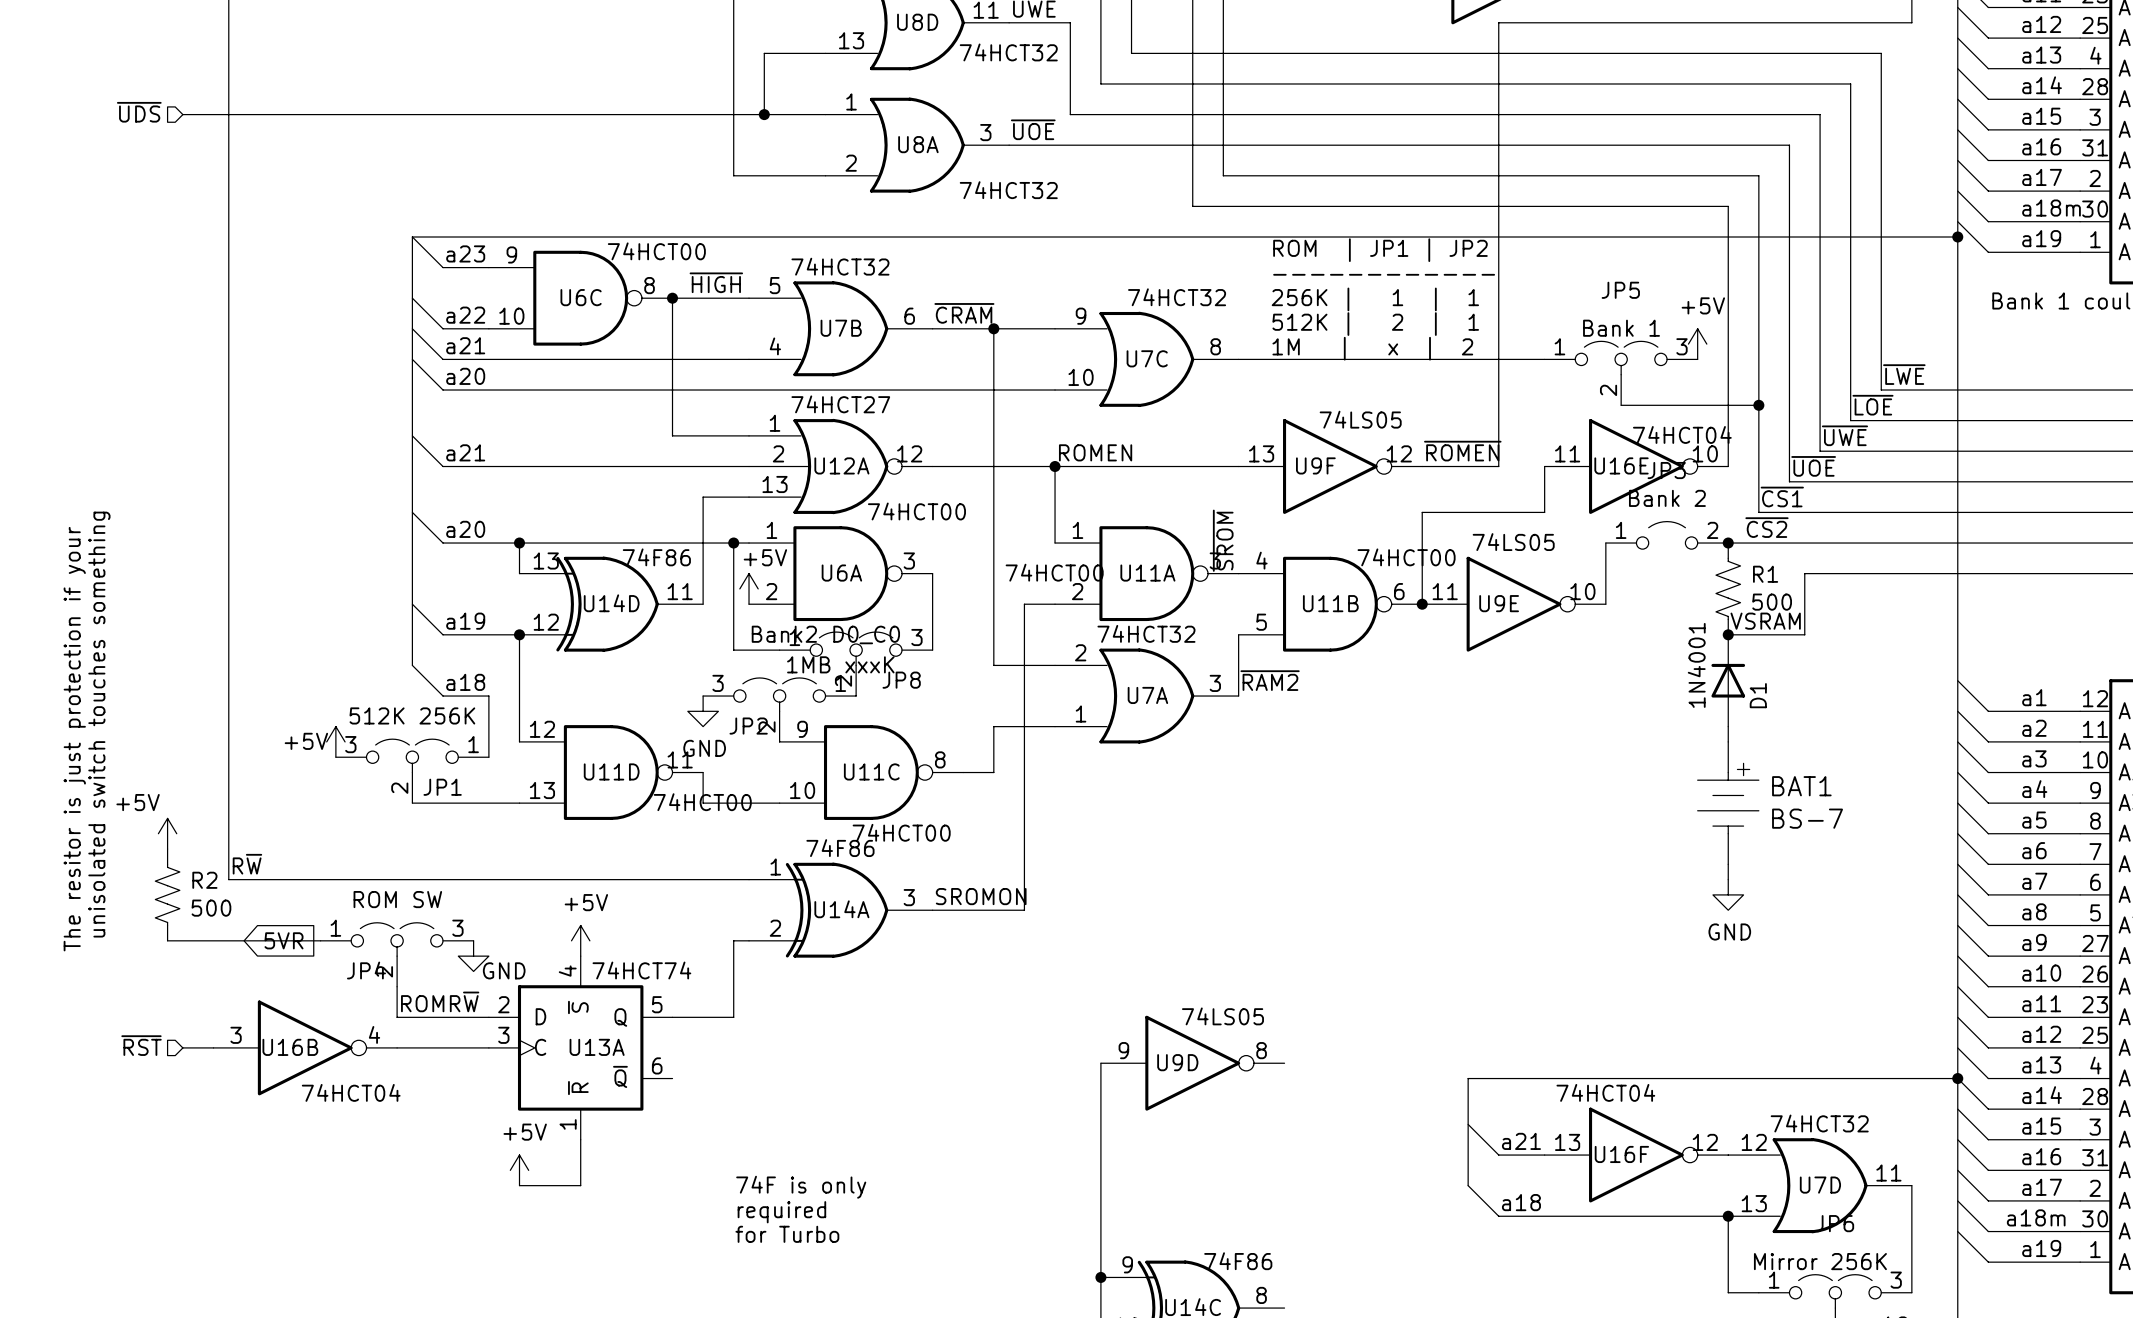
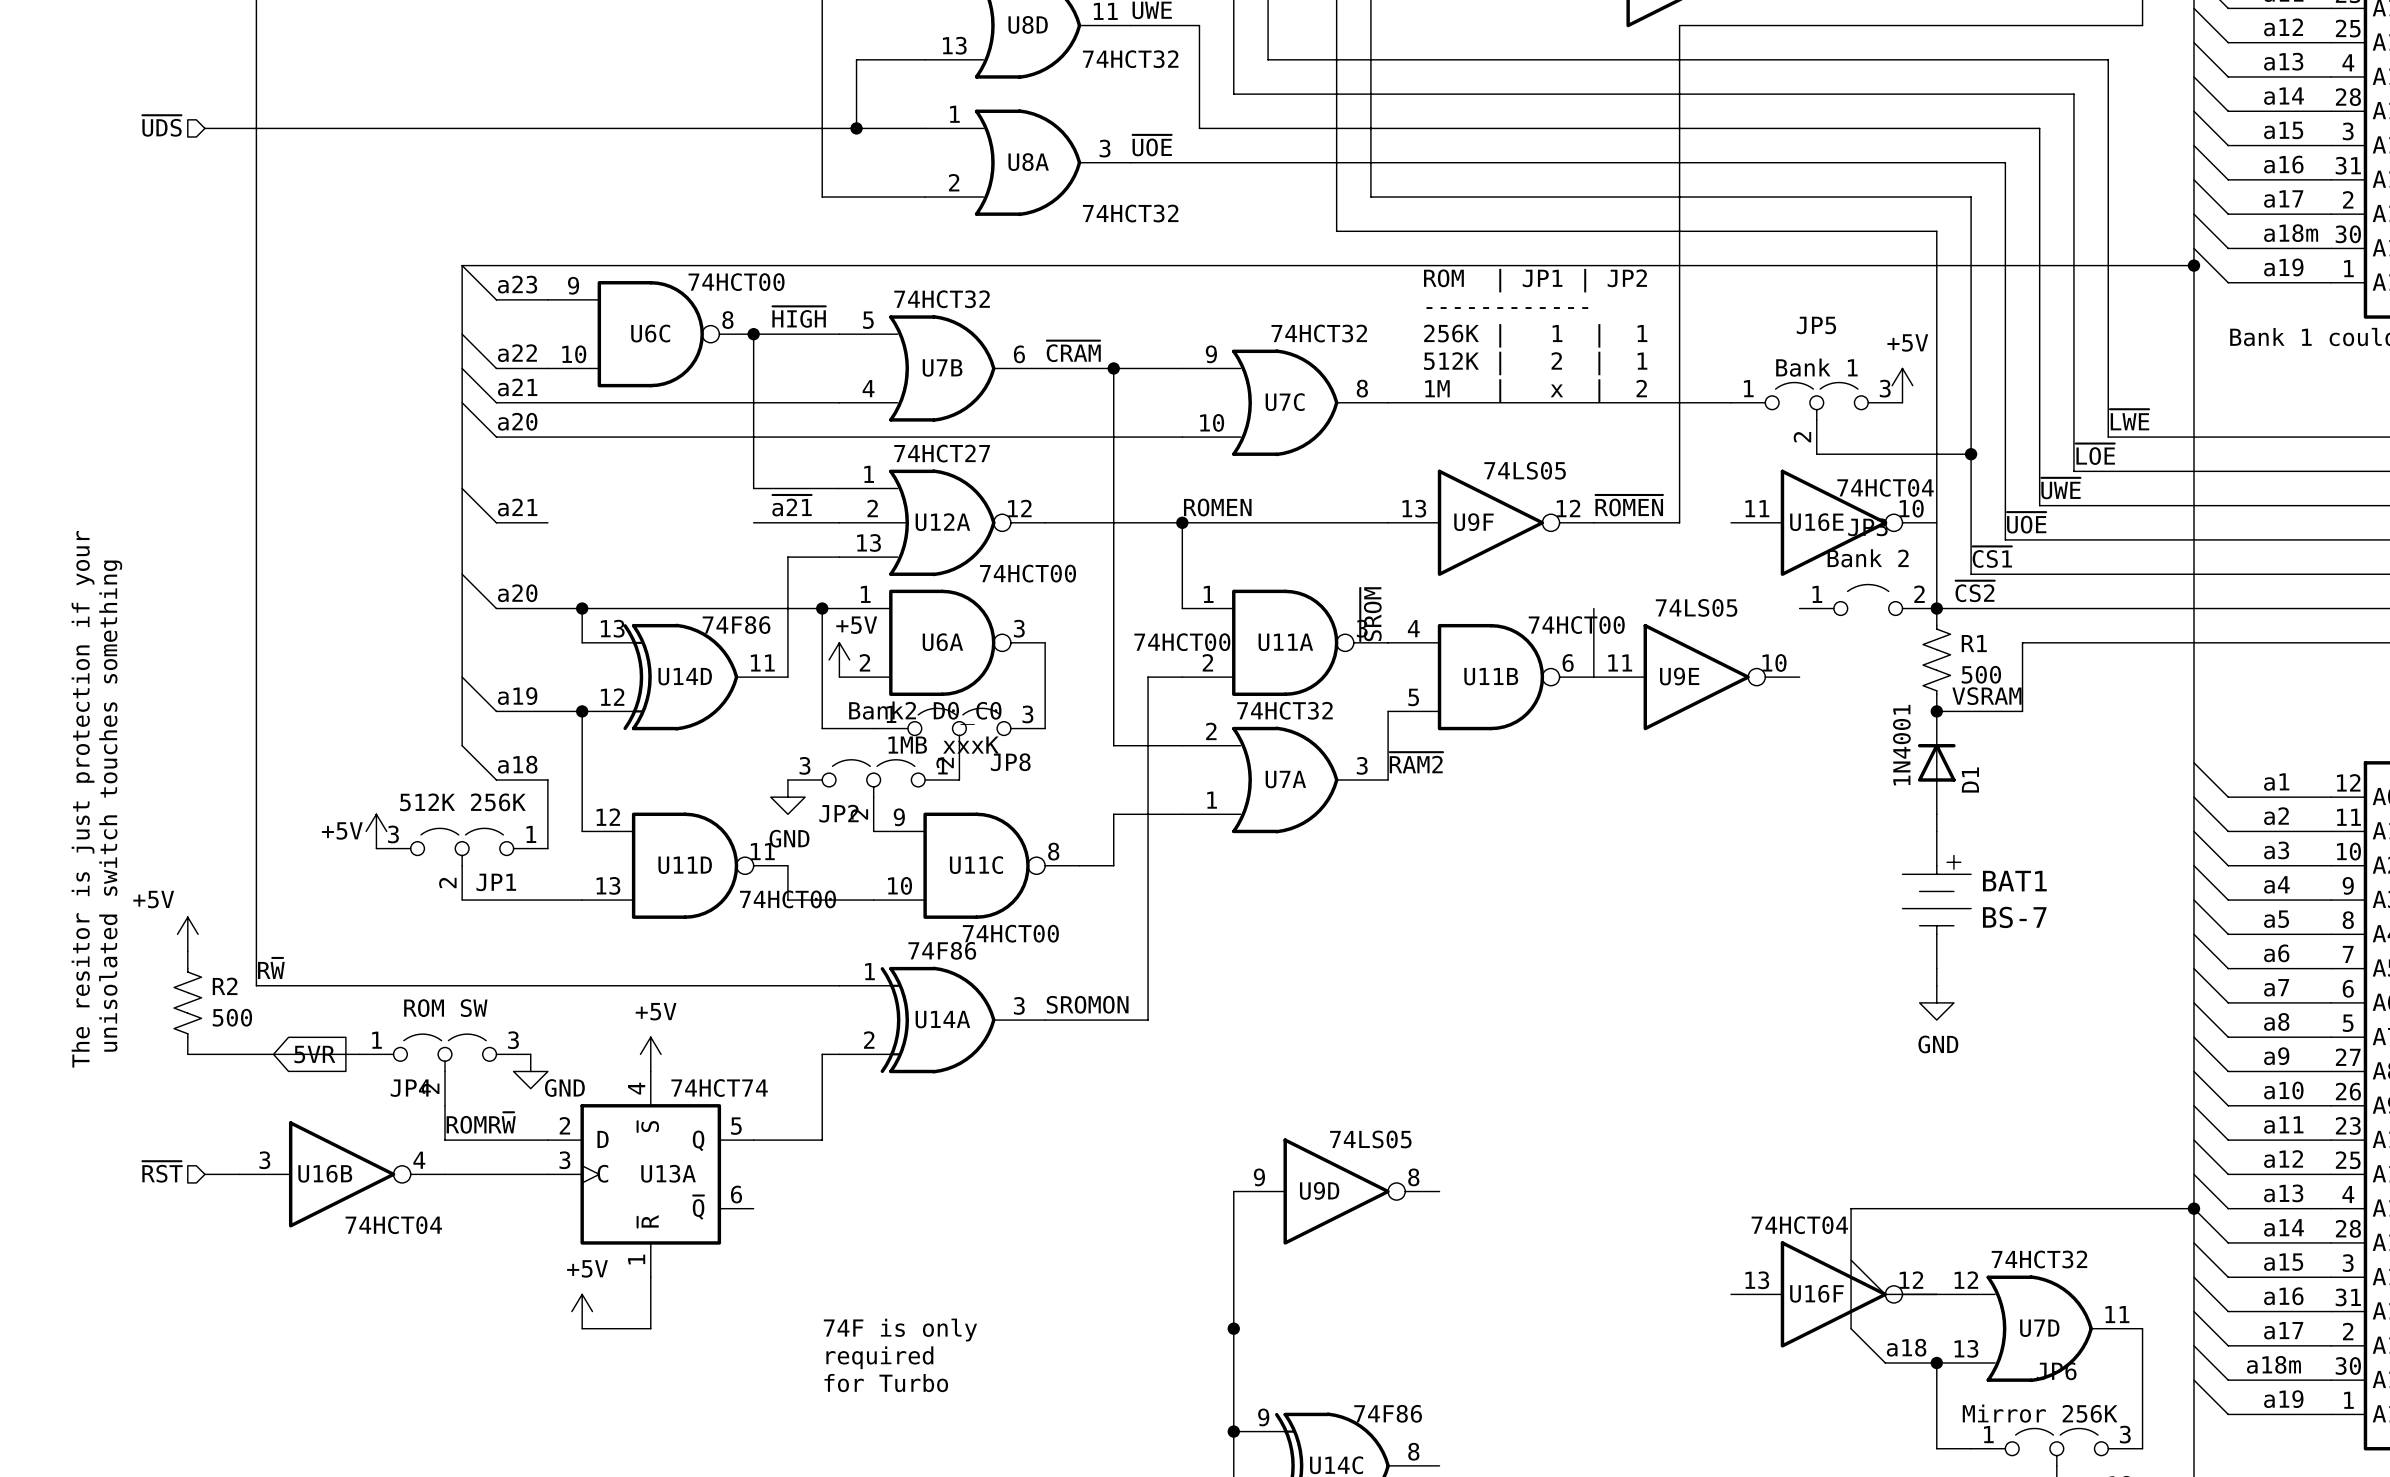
label: none -> ~{a21} (792, 505)
wire: (488, 466) (672, 466) -> none
wire: (1544, 466) (1544, 512) (1422, 512) (1422, 543) -> none
wire: none -> (1936, 522) (1936, 608)
wire: (1605, 543) (1605, 604) -> none
junction: (1422, 604) -> none
bus: (1651, 1078) (1468, 1078) (1468, 1185) -> (1851, 1208) (1851, 1328)
wire: (1468, 1124) (1498, 1155) (1544, 1155) -> (1851, 1260) (1885, 1294) (1936, 1294)
label: a21 (1521, 1141) -> none
junction: none -> (1233, 1328)
wire: (1468, 1185) (1498, 1216) (1682, 1216) -> (1851, 1328) (1885, 1362)
label position: a18 (1521, 1202) -> a18 (1906, 1347)

